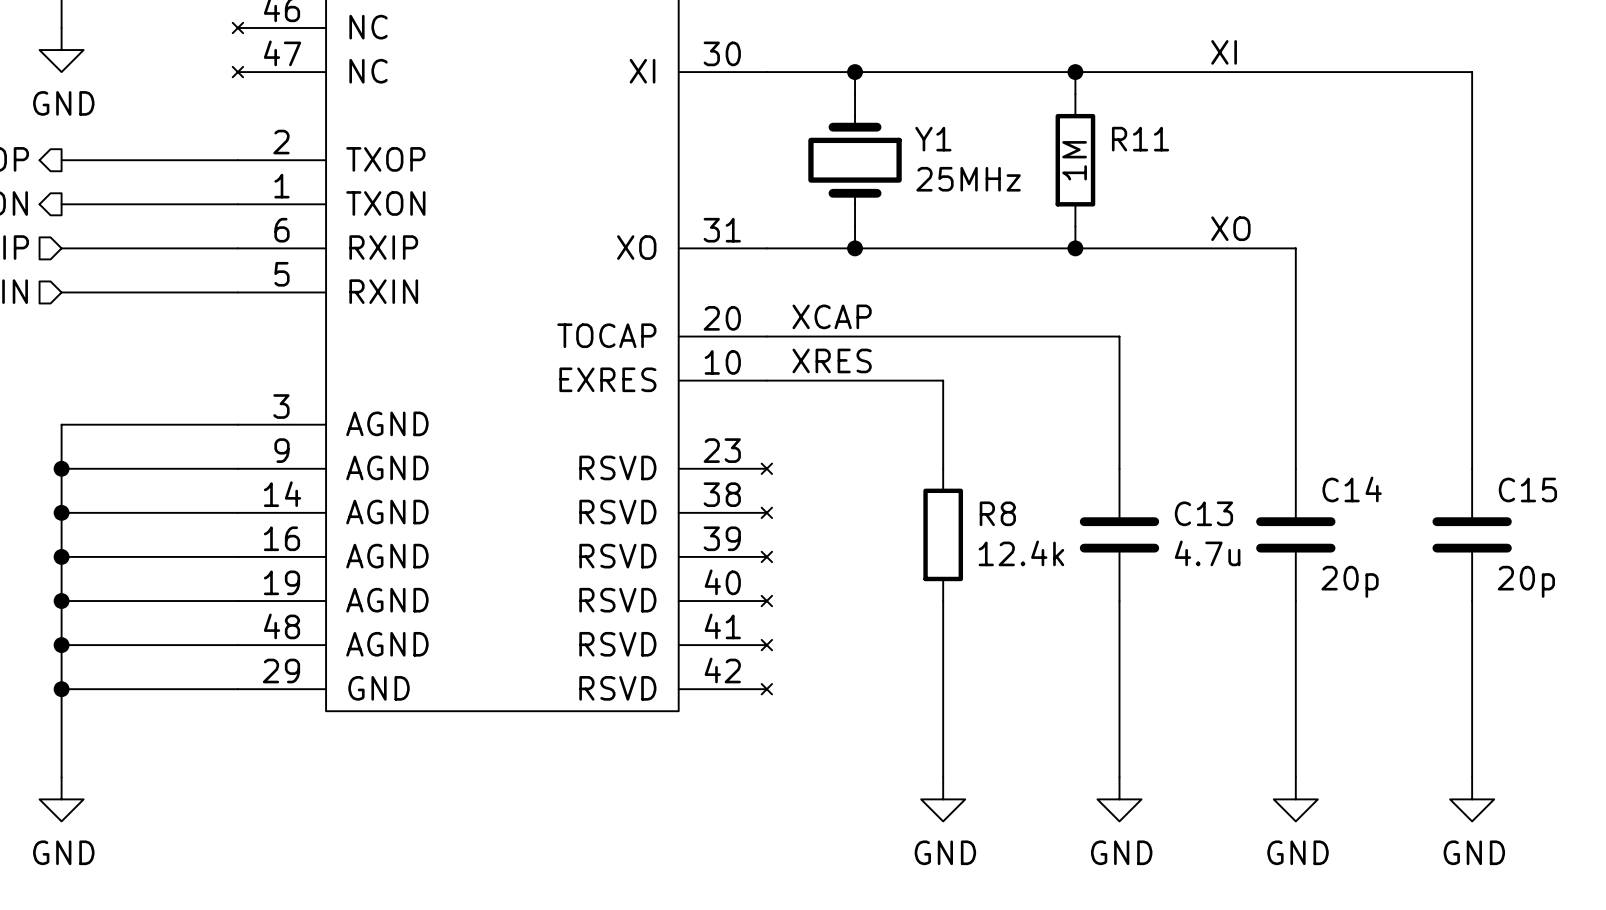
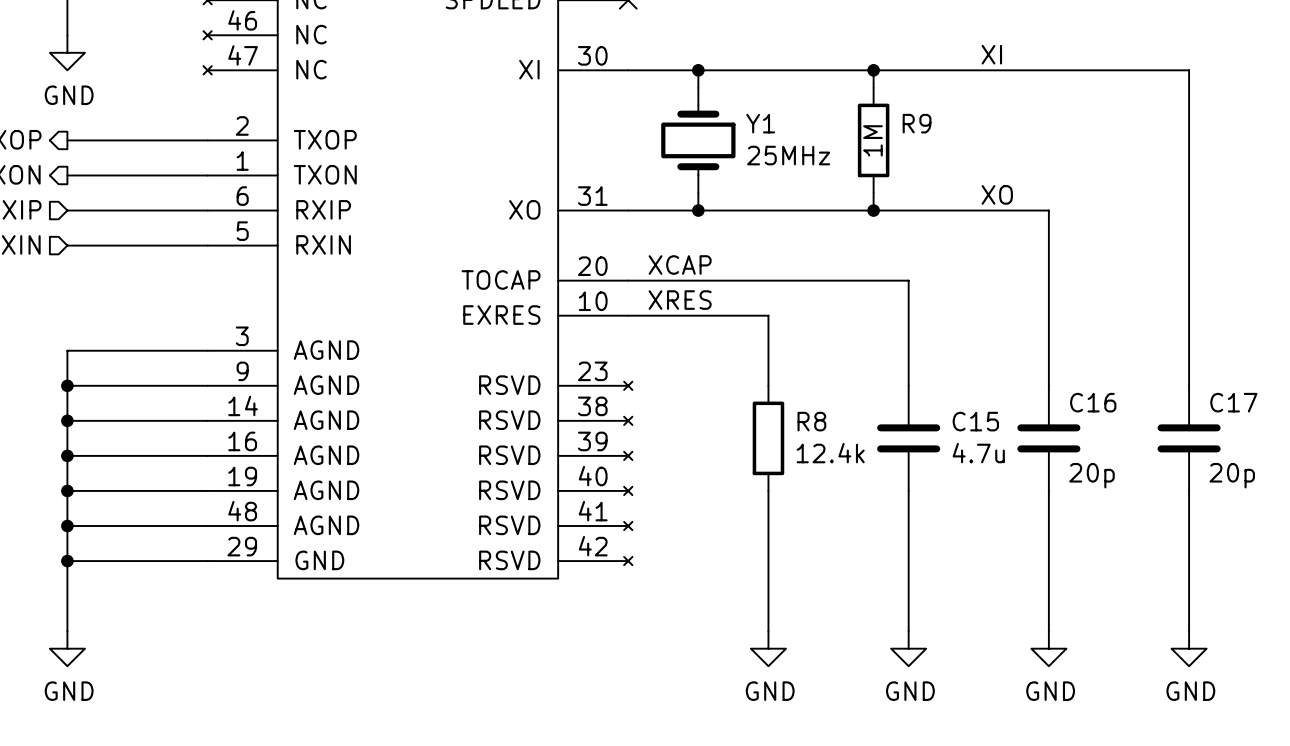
R11 name: R11 (1140, 139) -> R9 (917, 123)
C14 name: C14 (1352, 489) -> C16 (1093, 402)
C15 name: C15 (1527, 490) -> C17 (1233, 402)
C13 name: C13 (1203, 513) -> C15 (975, 421)

